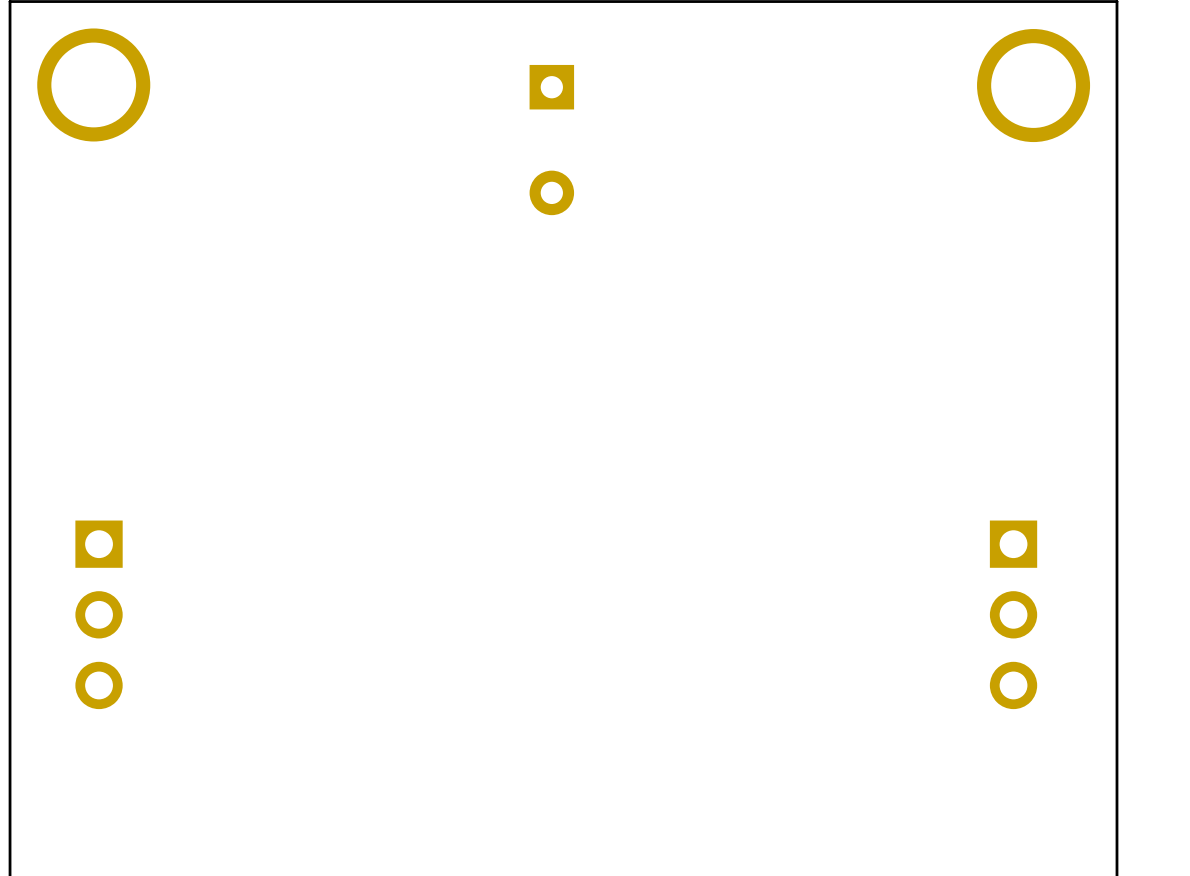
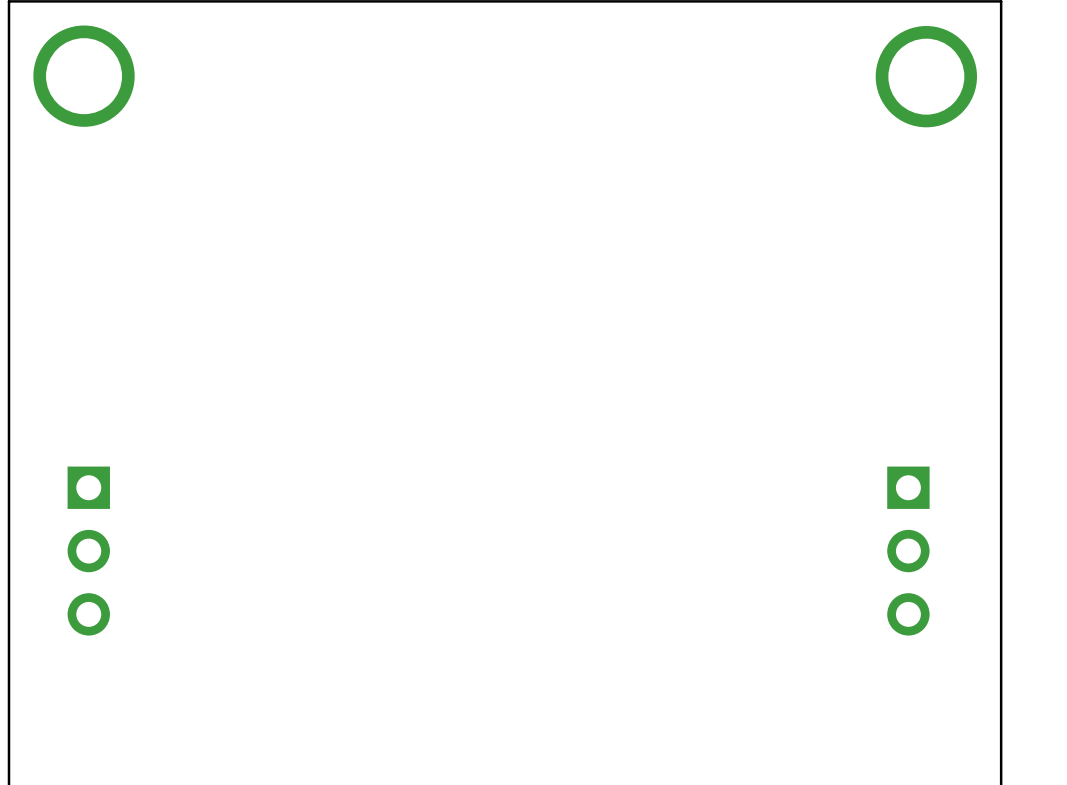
part: (551, 140) -> none

